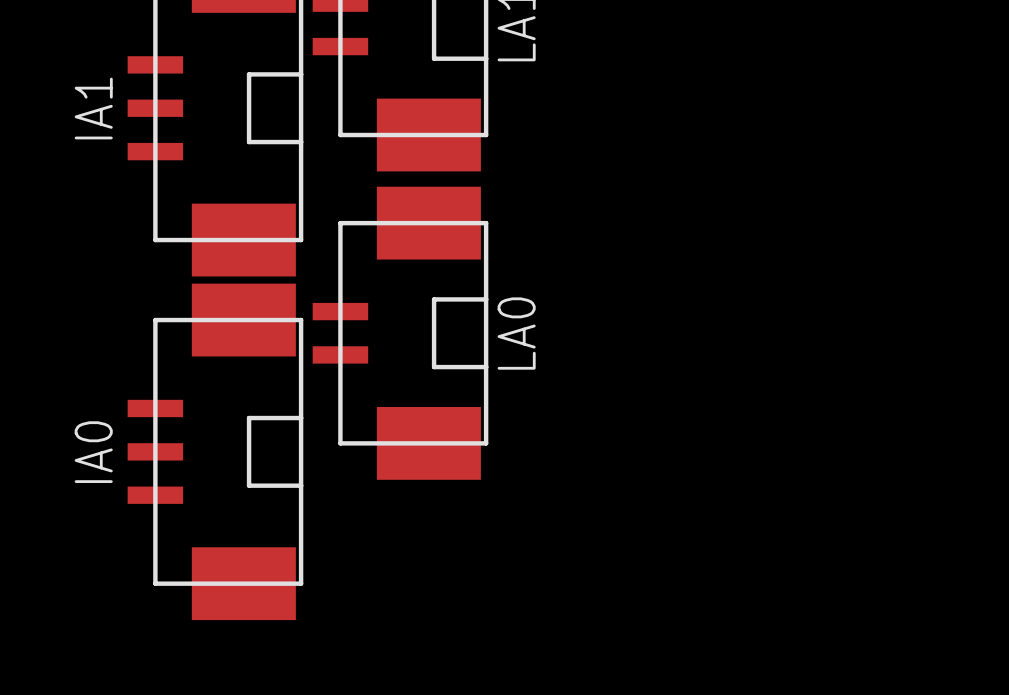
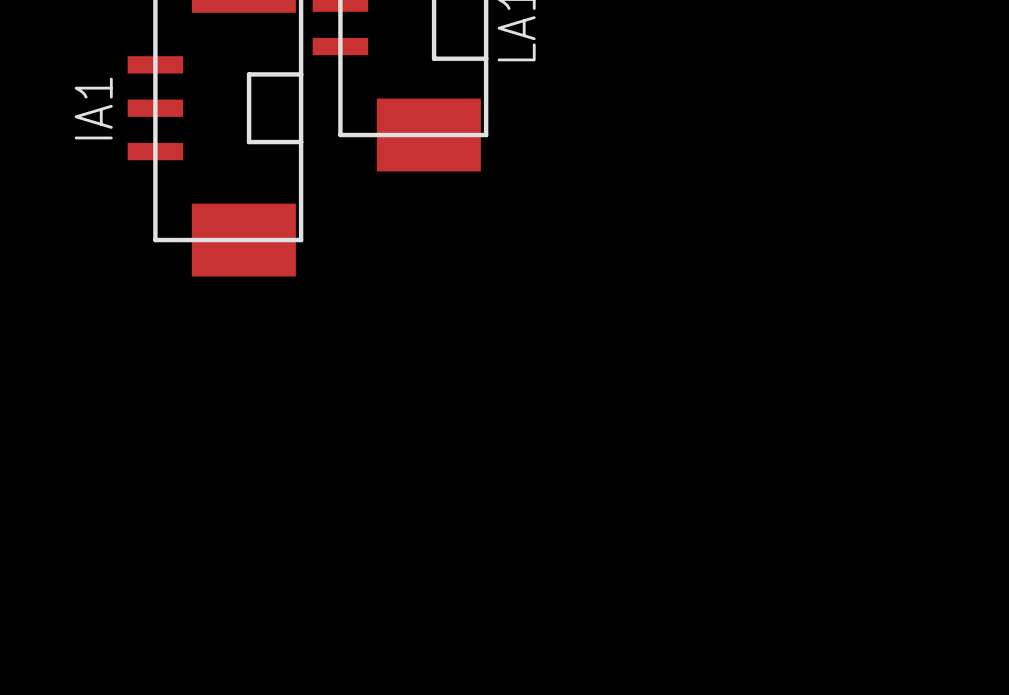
LA0: (400, 333) -> none
IA0: (215, 451) -> none

